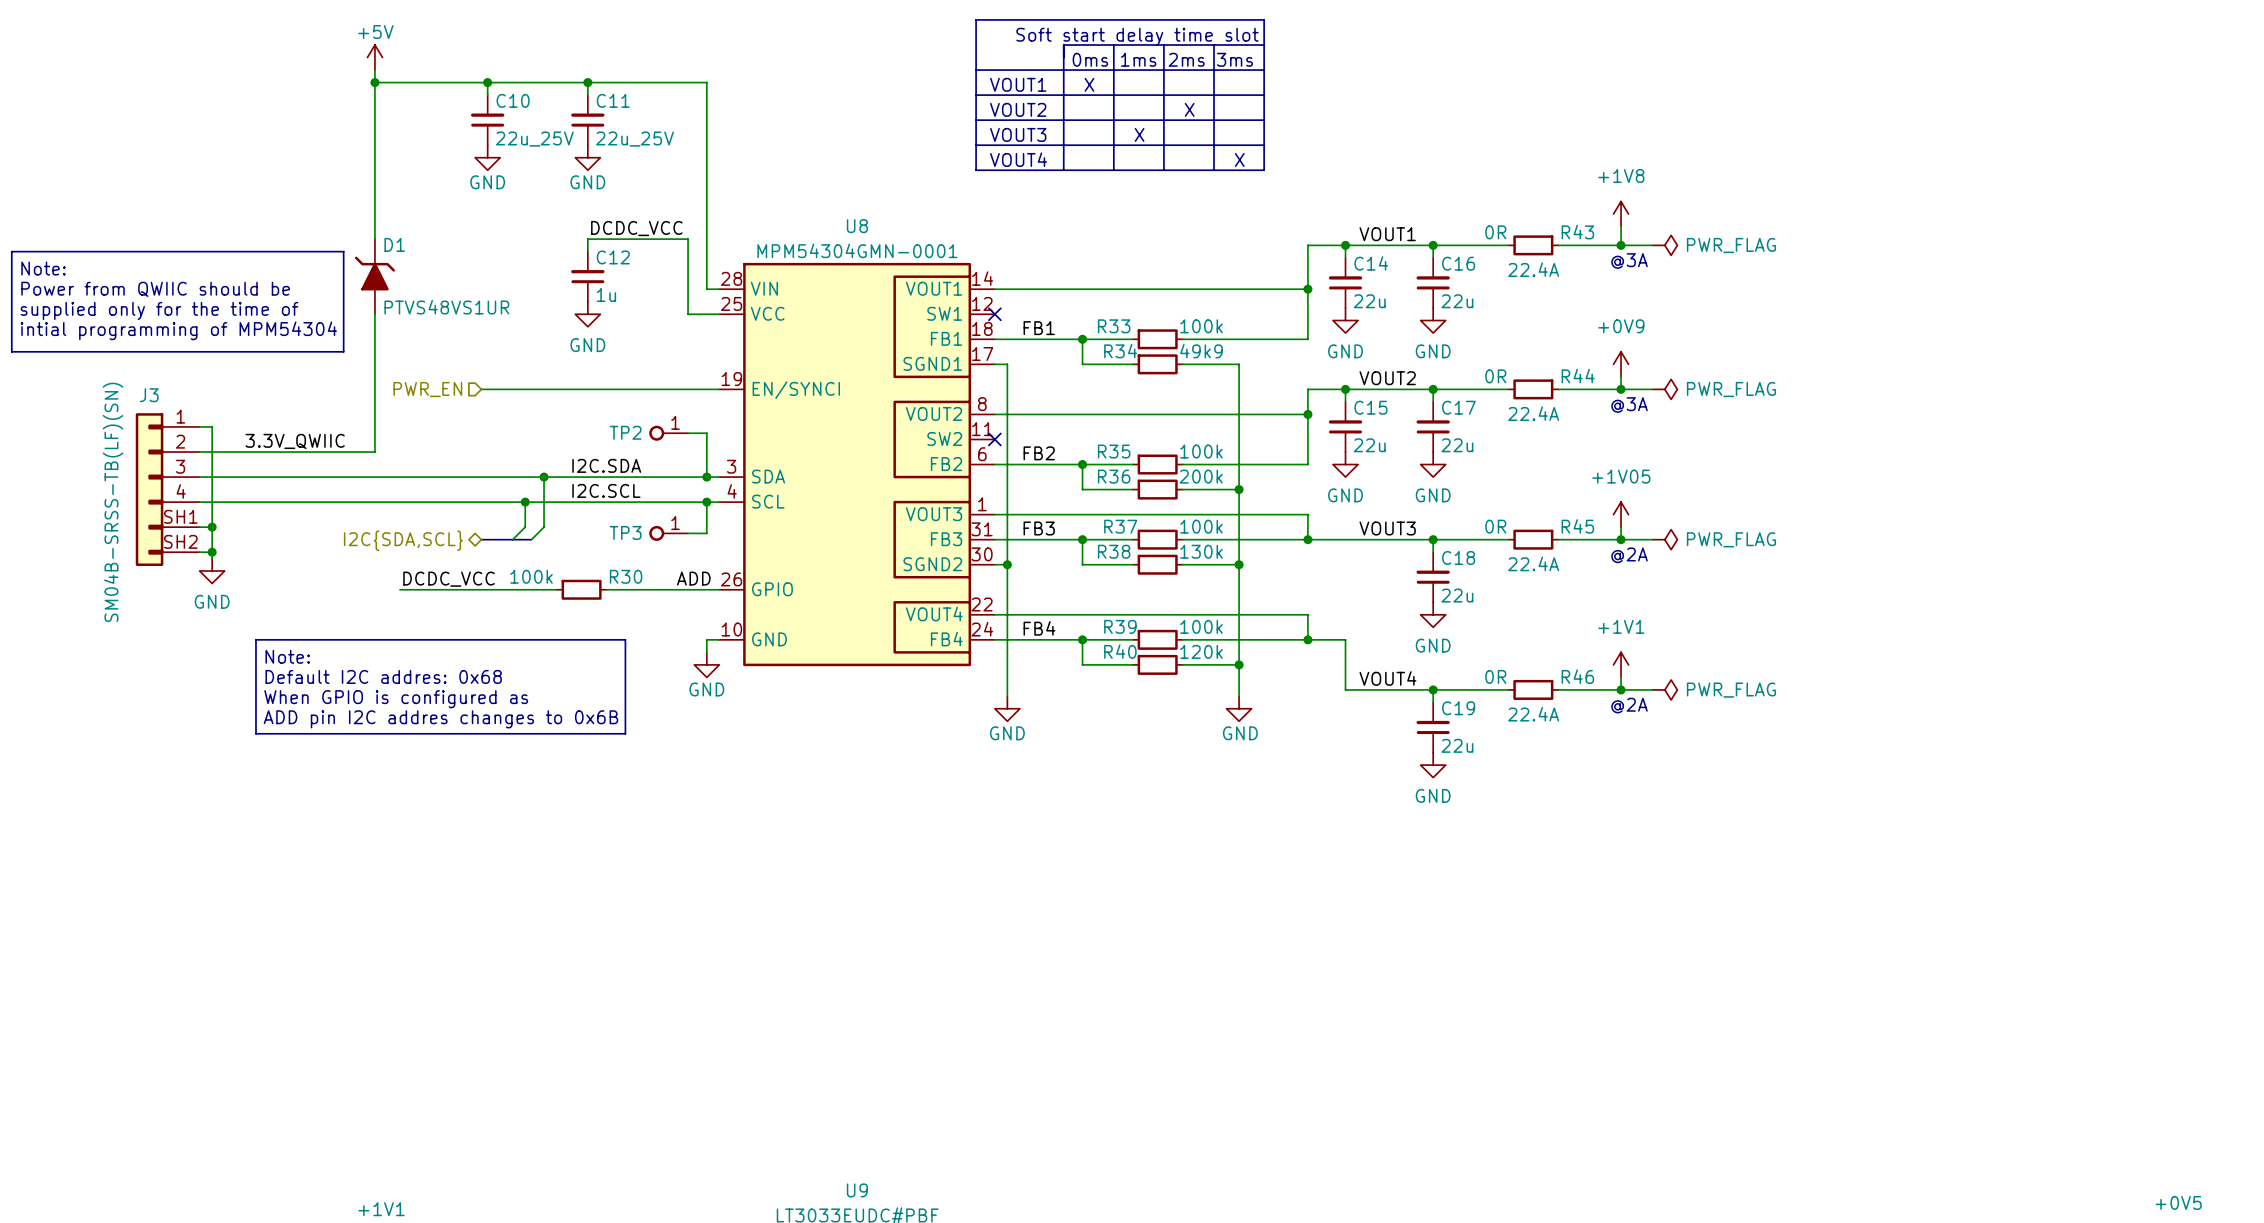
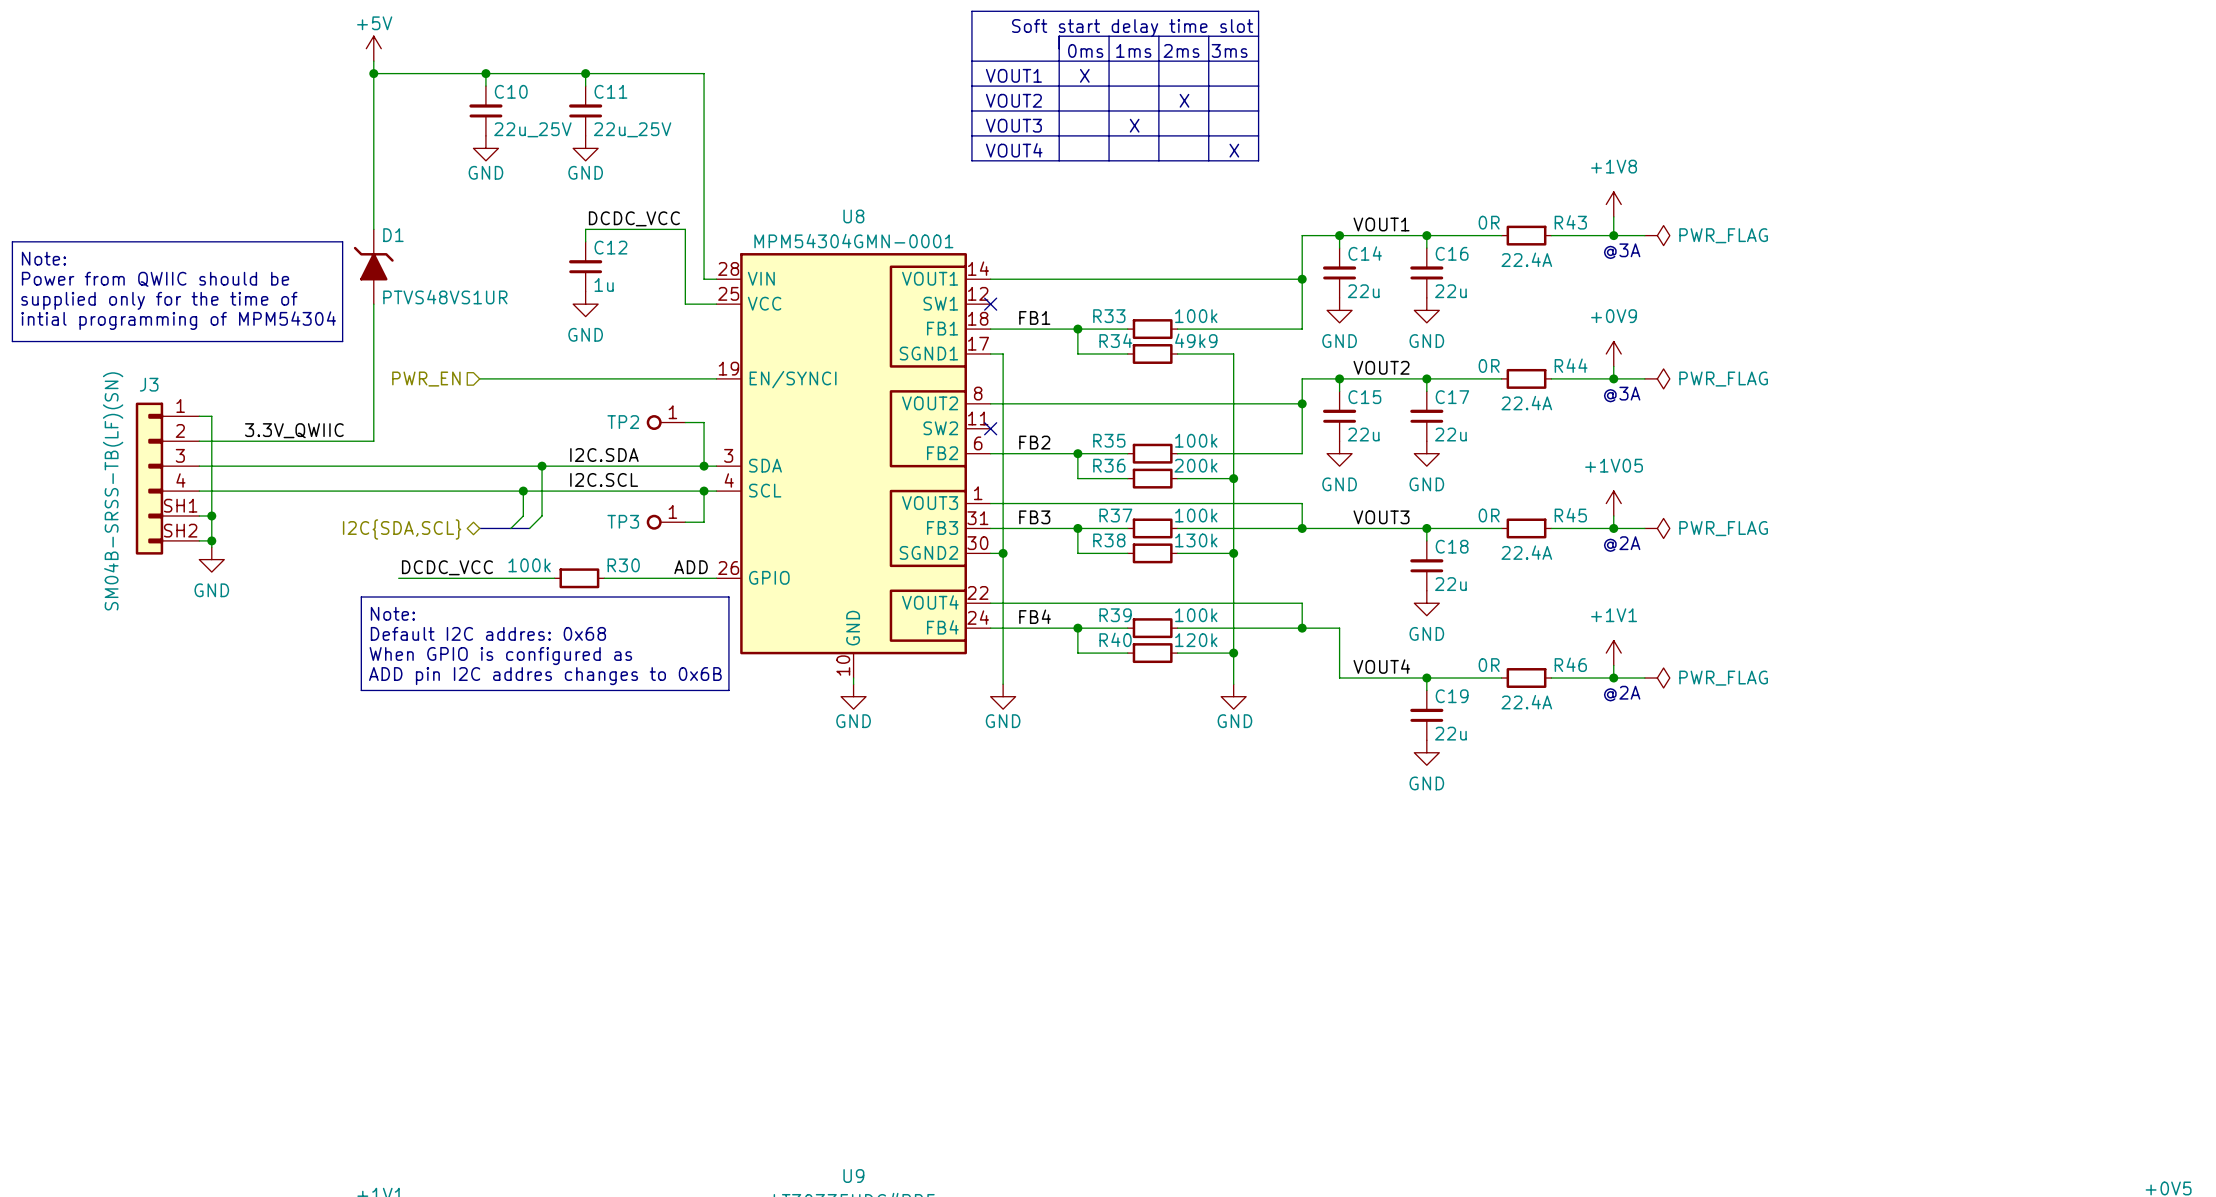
U8 symbol: [719, 250, 995, 667] -> [716, 240, 991, 679]
line: (255, 639) (625, 639) (625, 733) (255, 733) (255, 639) -> (361, 597) (728, 597) (728, 690) (361, 690) (361, 597)
wire: (719, 639) (706, 639) (706, 652) -> none
text position: Note: (287, 656) -> Note: (392, 613)
power symbol position: GND (706, 664) -> GND (853, 696)
text position: Default I2C addres: 0x68 (383, 676) -> Default I2C addres: 0x68 (488, 633)
wire: none -> (853, 678) (853, 684)
text position: When GPIO is configured as (396, 699) -> When GPIO is configured as (500, 656)
text position: ADD pin I2C addres changes to 0x6B (440, 719) -> ADD pin I2C addres changes to 0x6B (545, 676)

